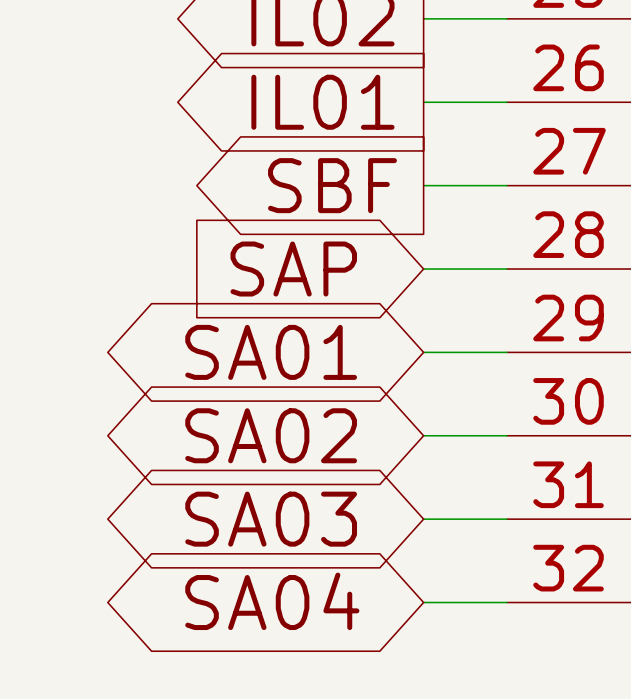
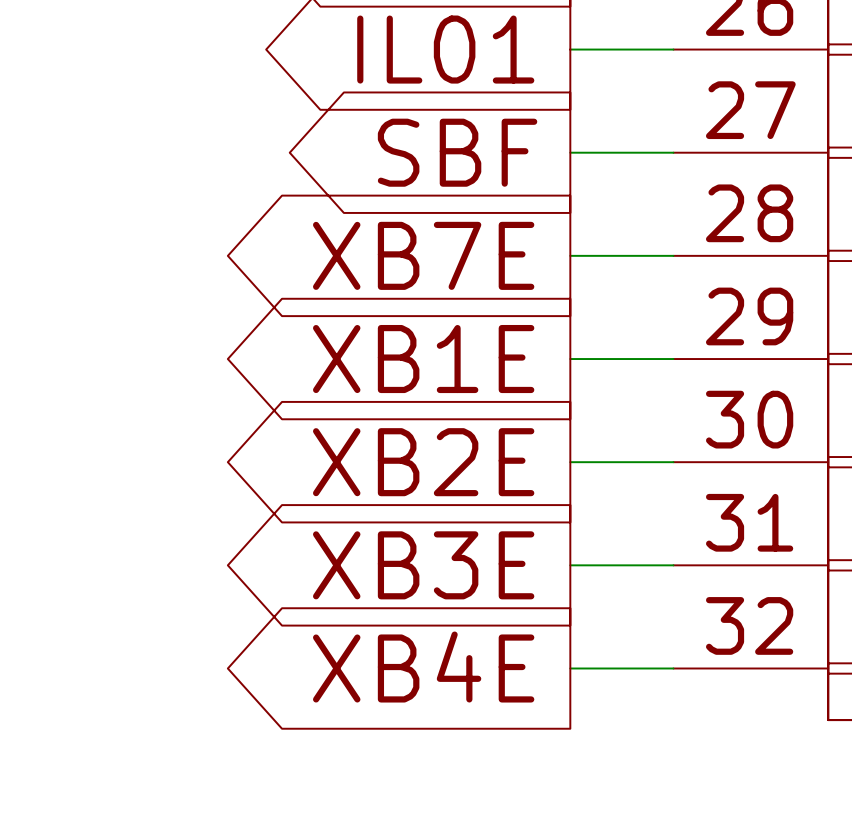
global label shape: input (293, 269) -> output (423, 255)
global label: SAP (293, 269) -> XB7E (423, 255)
global label shape: bidirectional (271, 352) -> output (423, 359)
global label: SA01 (271, 352) -> XB1E (423, 359)
global label shape: bidirectional (271, 435) -> output (423, 462)
global label: SA02 (271, 435) -> XB2E (423, 462)
global label shape: bidirectional (271, 519) -> output (423, 565)
global label: SA03 (271, 519) -> XB3E (423, 565)
global label shape: bidirectional (272, 601) -> output (423, 667)
global label: SA04 (272, 601) -> XB4E (423, 667)

